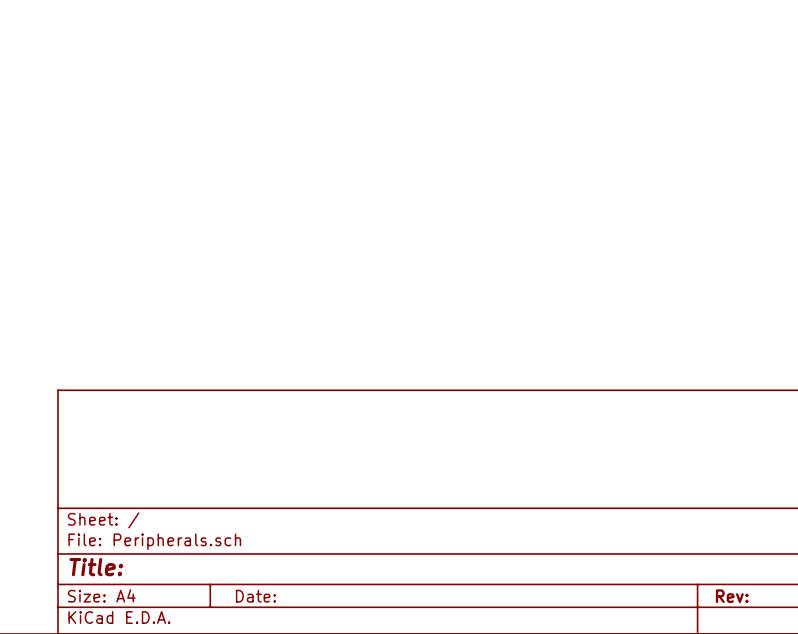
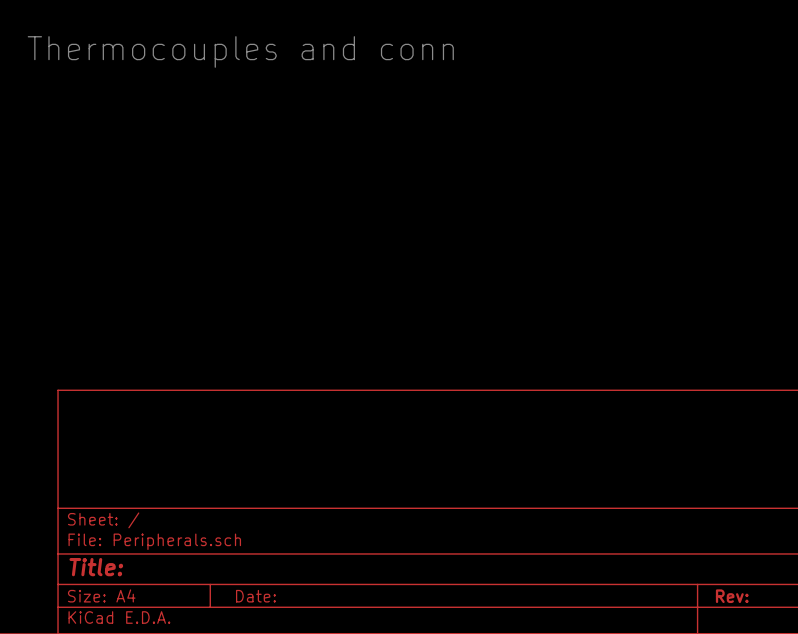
text: none -> Thermocouples and conn (240, 51)

